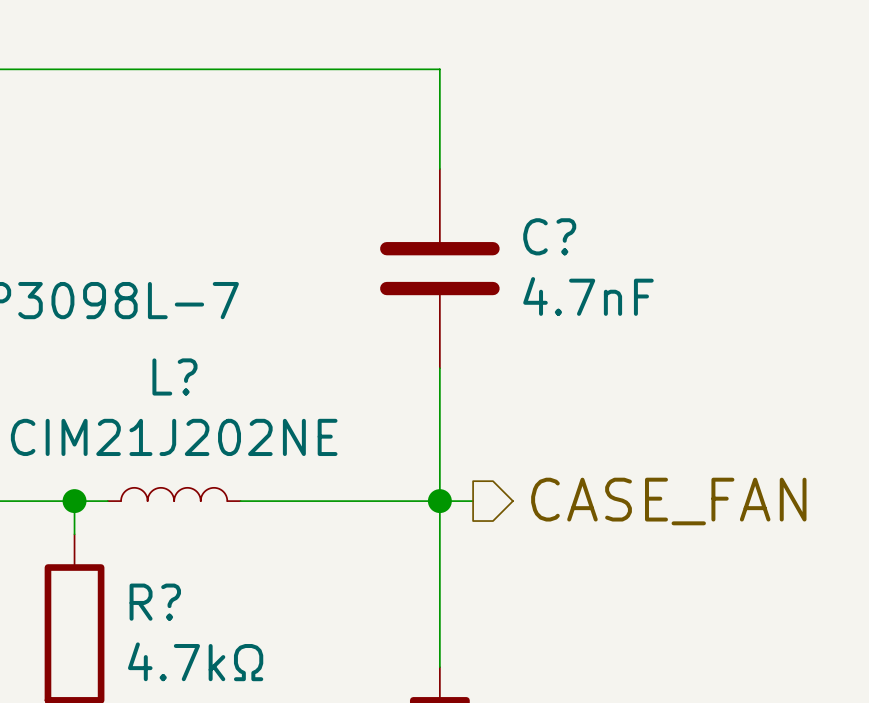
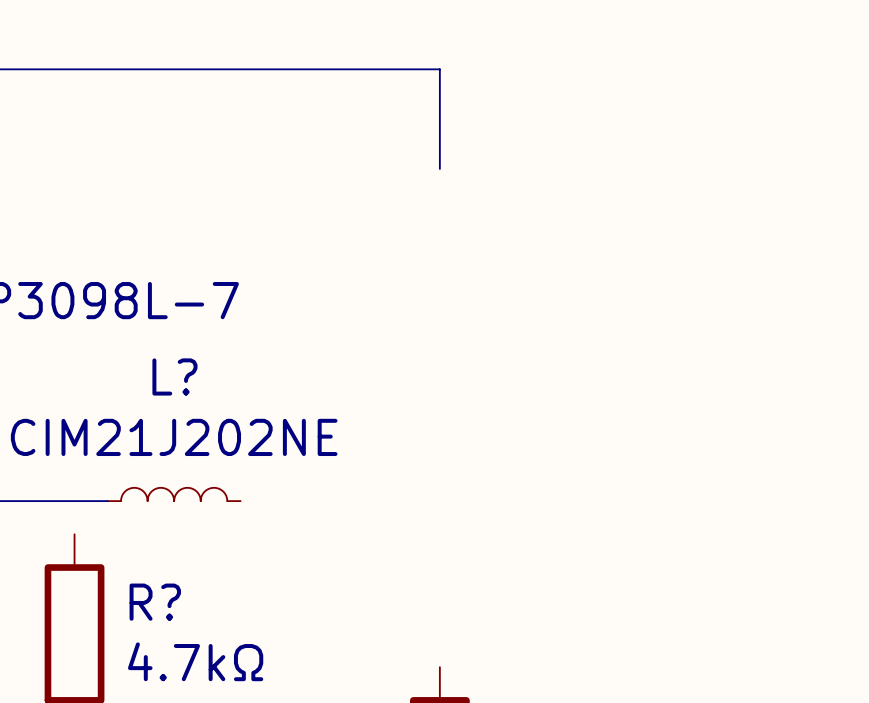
C?: 4.7nF (439, 268) -> none
wire: (439, 368) (439, 667) -> none
wire: (74, 501) (74, 534) -> none
junction: (74, 501) -> none
wire: (240, 501) (473, 501) -> none
junction: (439, 501) -> none
hierarchical label: CASE_FAN (668, 501) -> none

